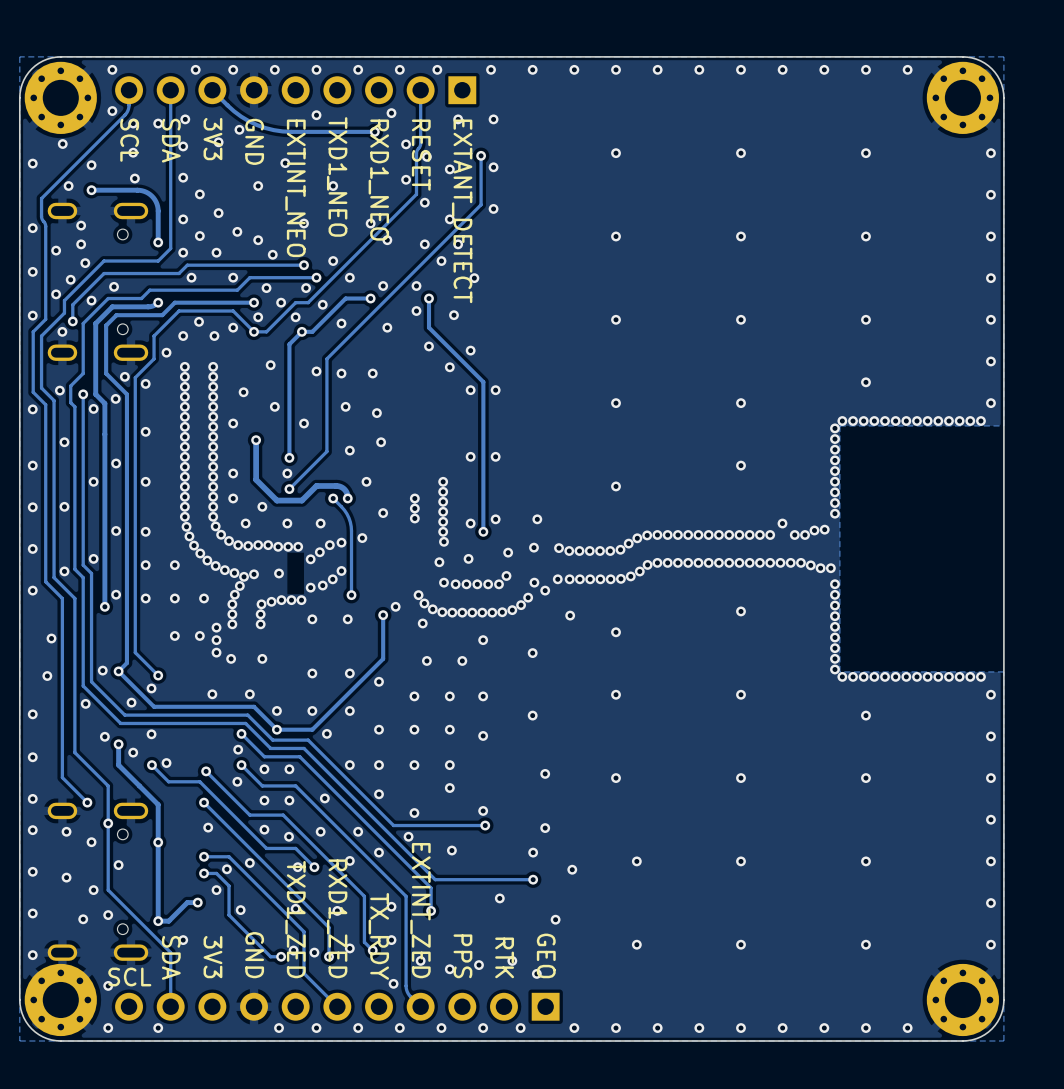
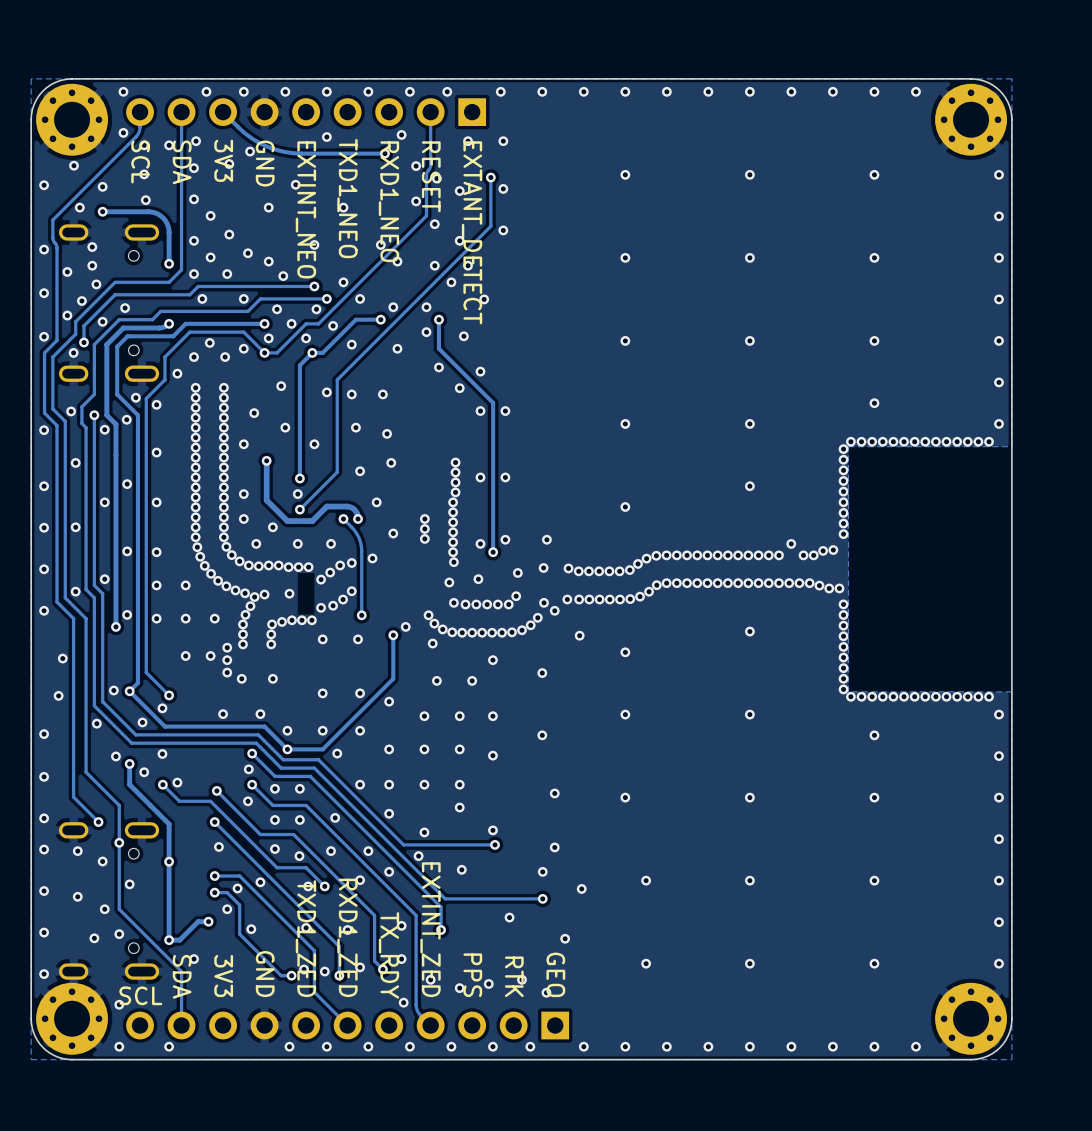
via: none -> (455, 462)
via: none -> (455, 472)
via: none -> (455, 482)
via: none -> (455, 492)

